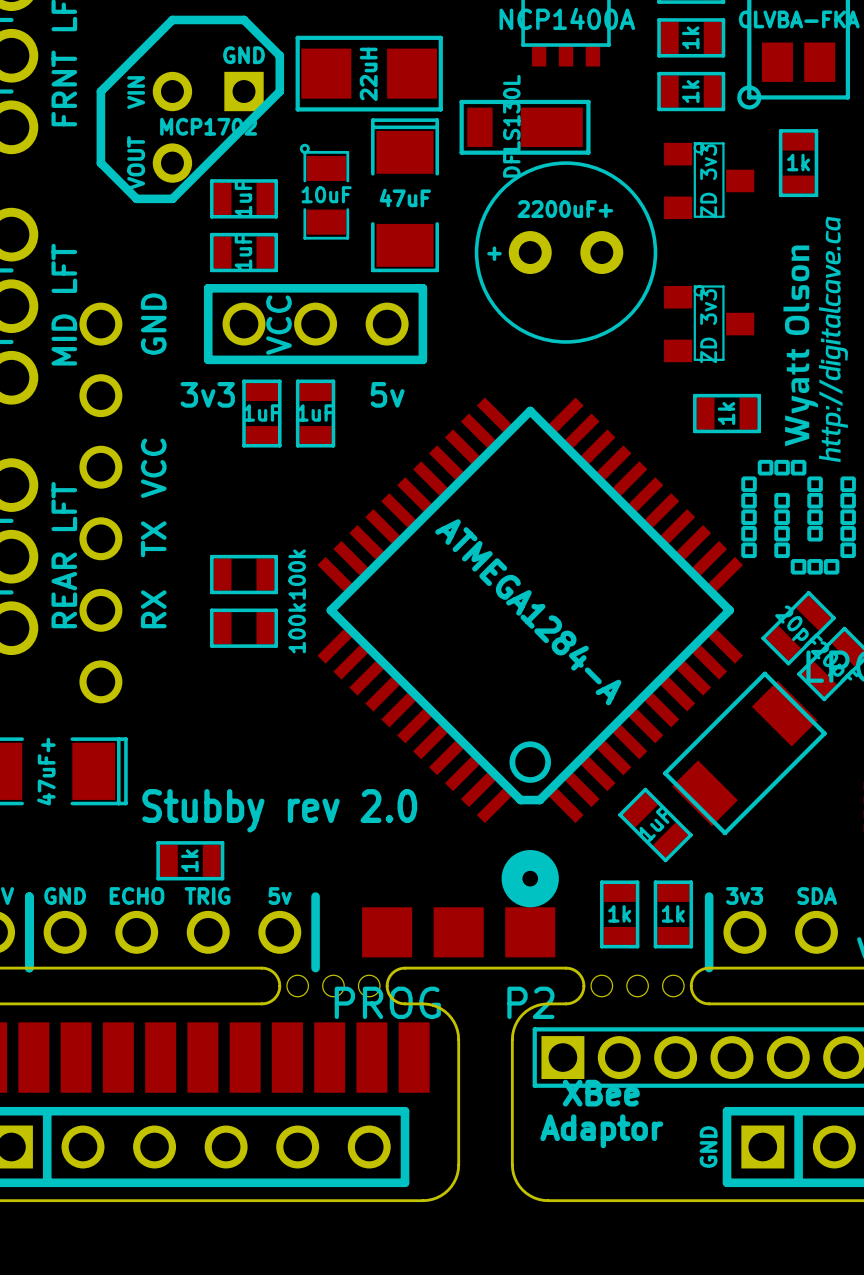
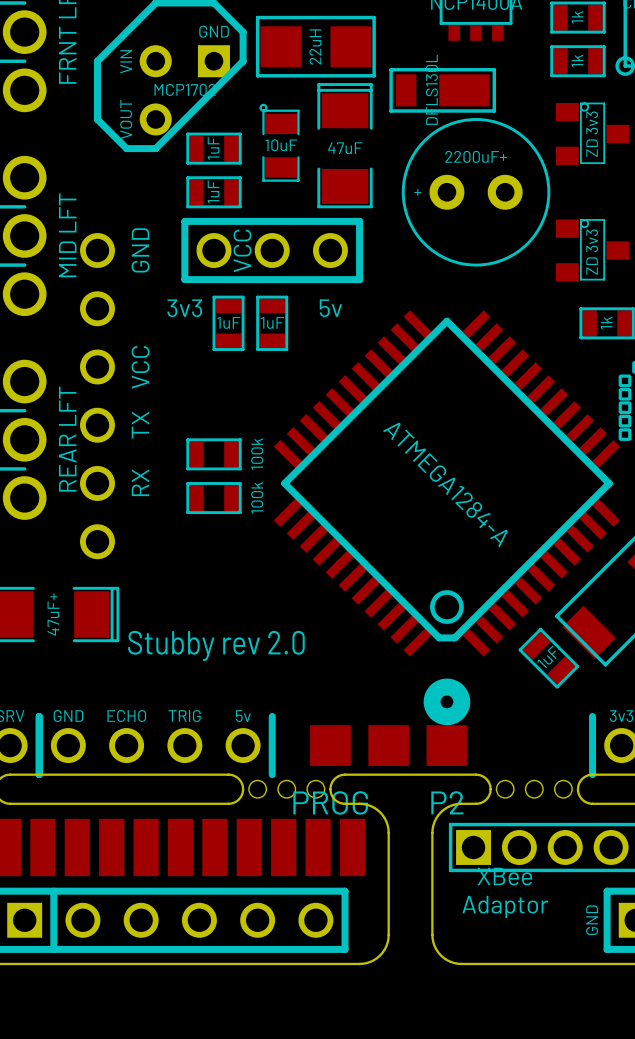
part: 1k (190, 860) -> none
part: 1k (619, 914) -> none
part: 1k (673, 914) -> none

